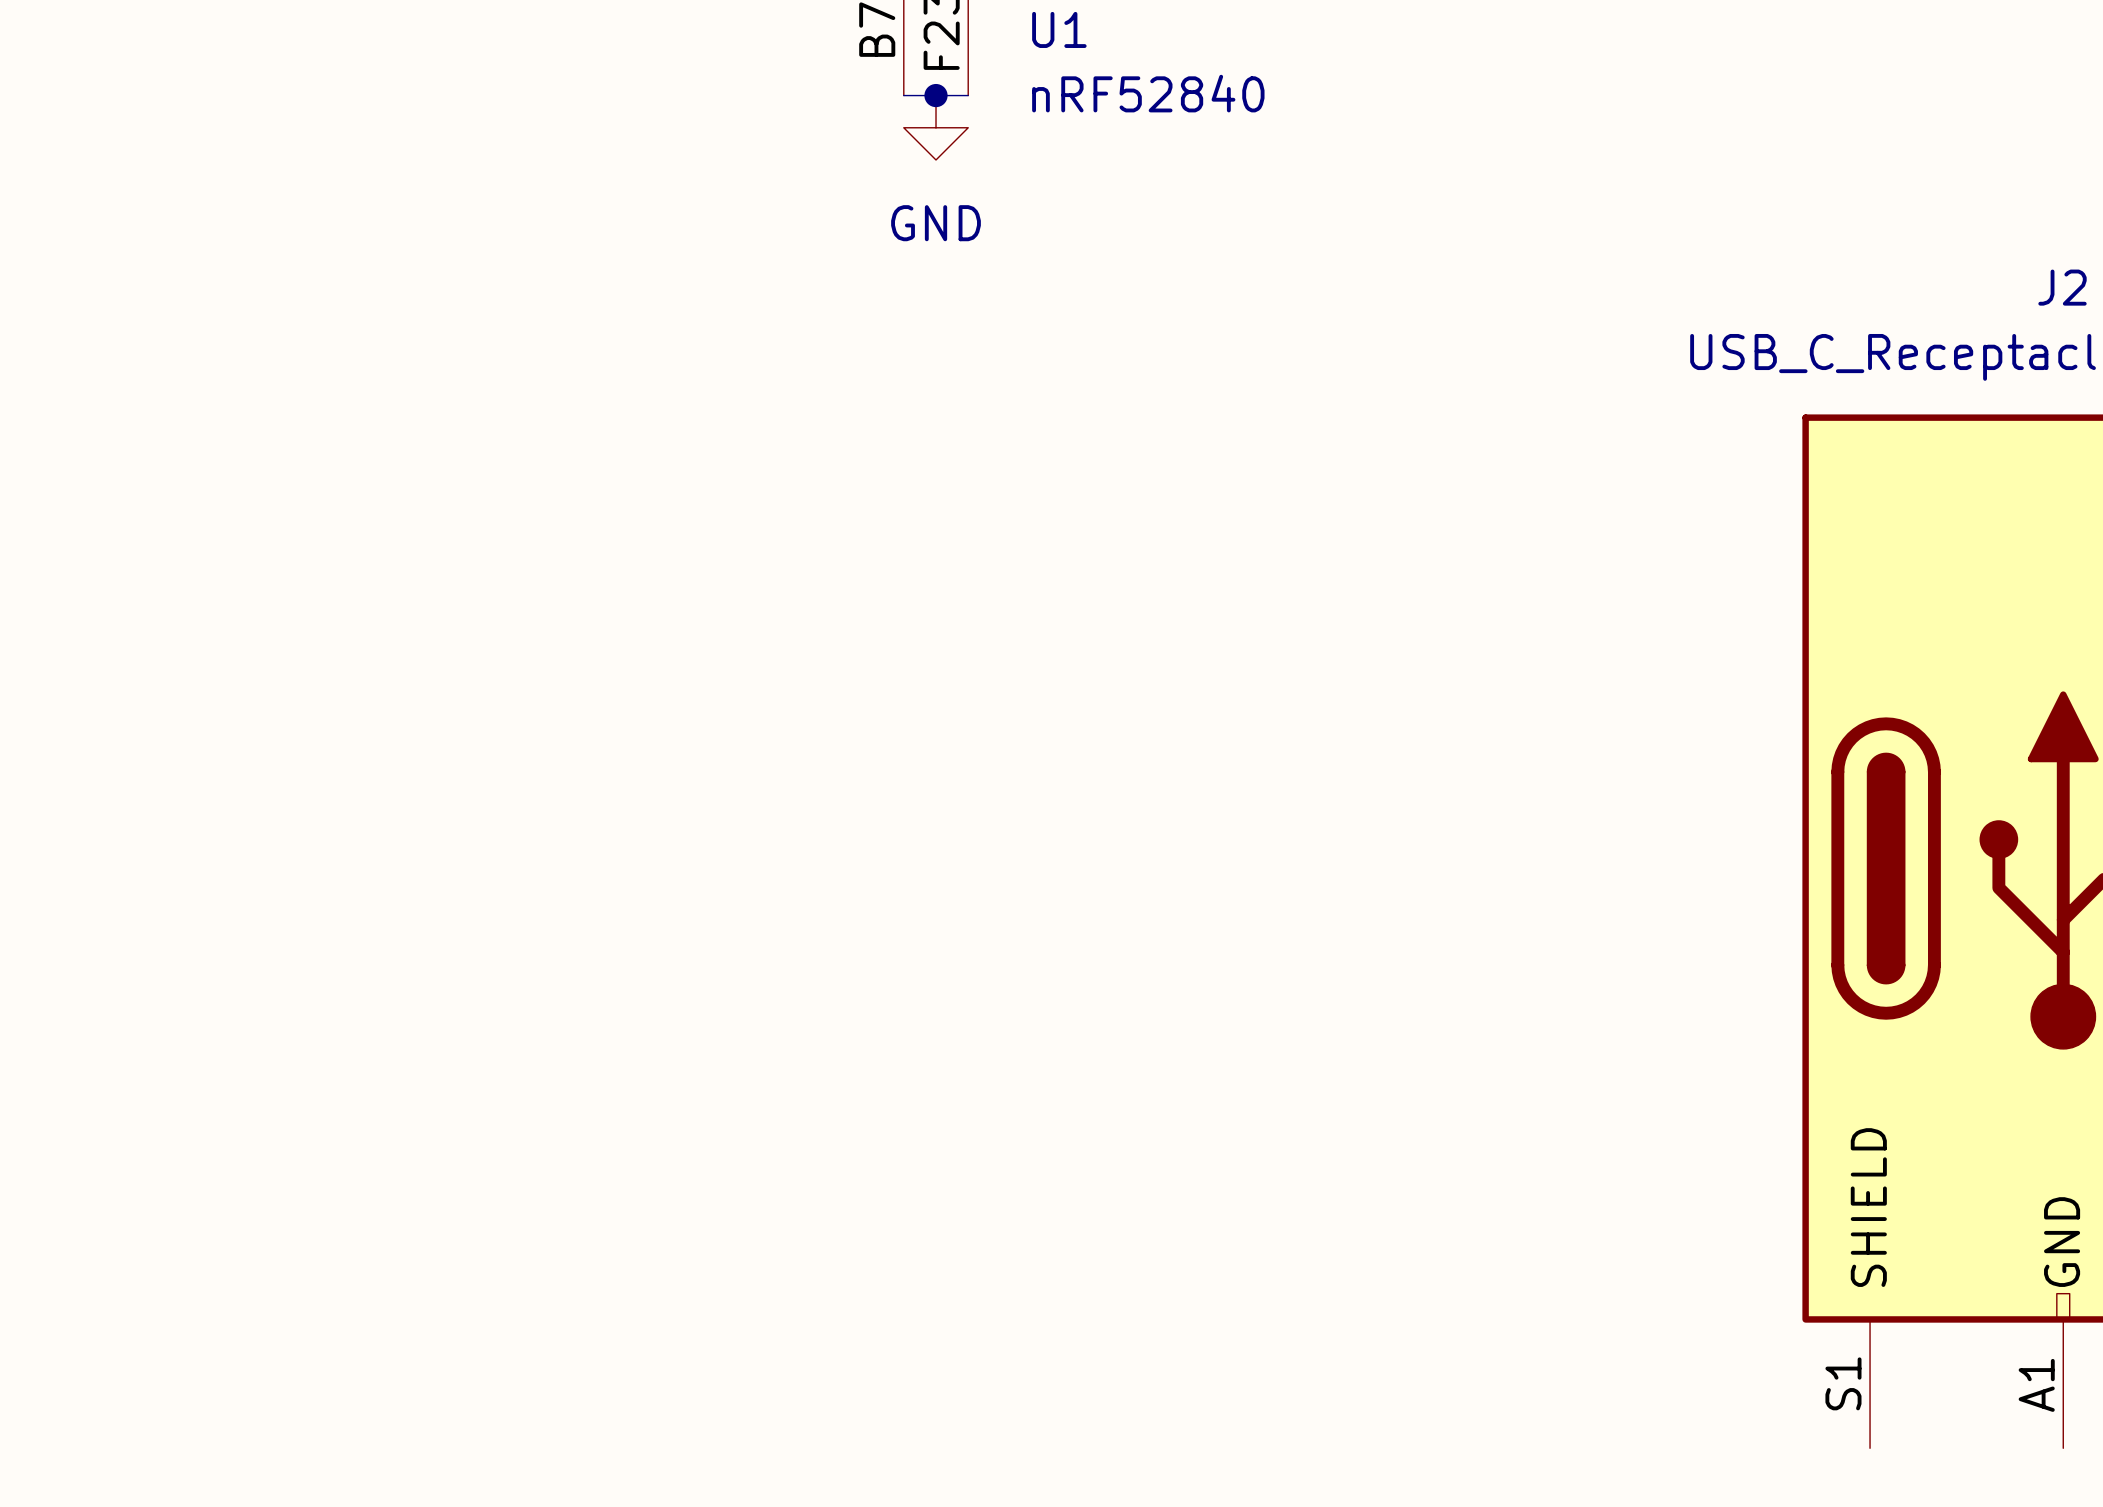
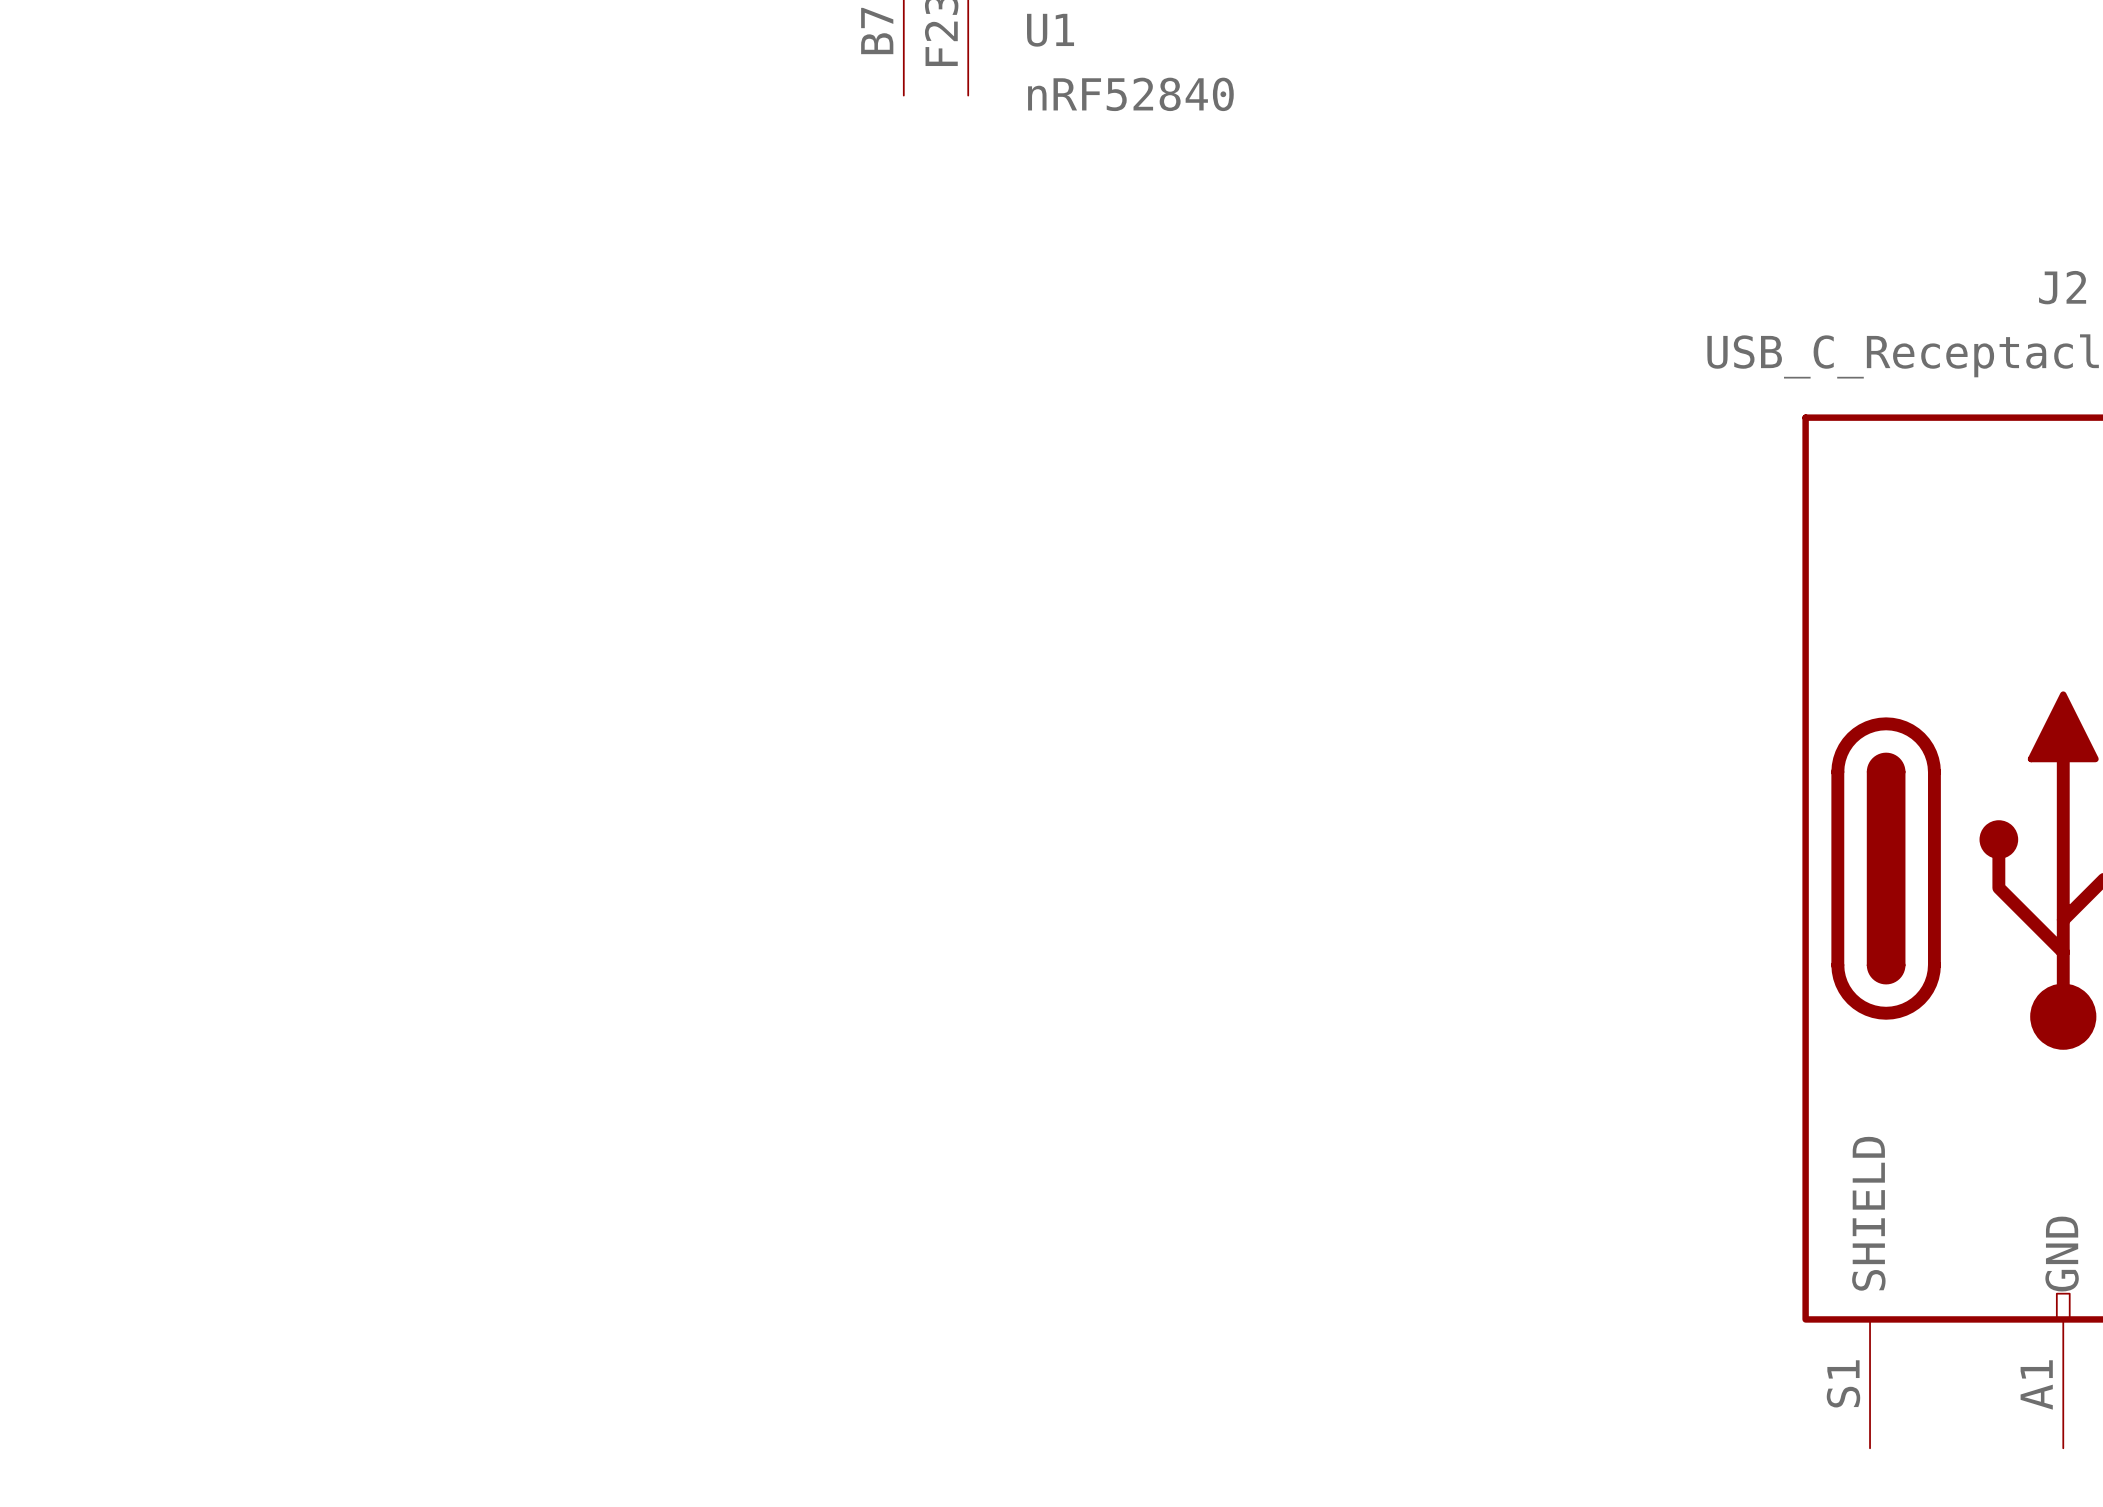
wire: (903, 95) (968, 95) -> none
junction: (936, 95) -> none
power symbol: GND (936, 127) -> none

